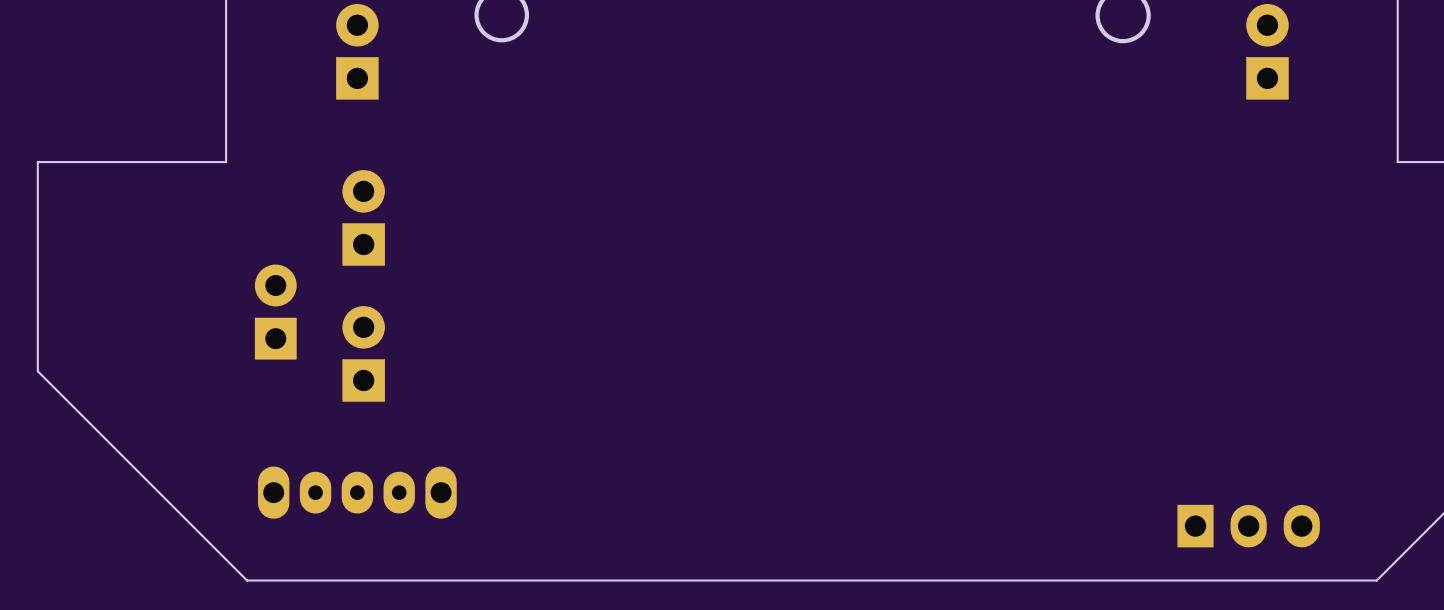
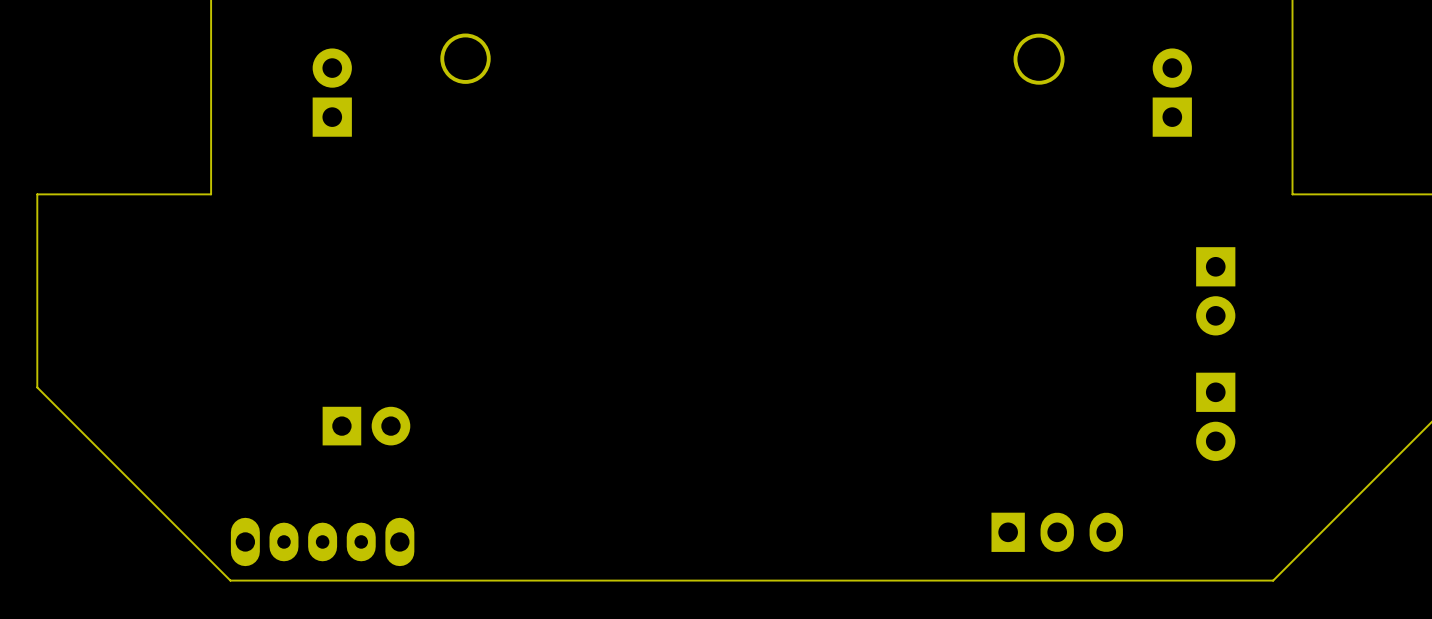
part: (363, 217) -> none
part: none -> (1215, 291)
part rotation: 0° (275, 312) -> 90° clockwise (366, 426)
part position: (275, 312) -> (366, 426)
part: (363, 353) -> none
part: none -> (1215, 416)
part position: (357, 492) -> (322, 541)
part position: (1248, 526) -> (1057, 532)

